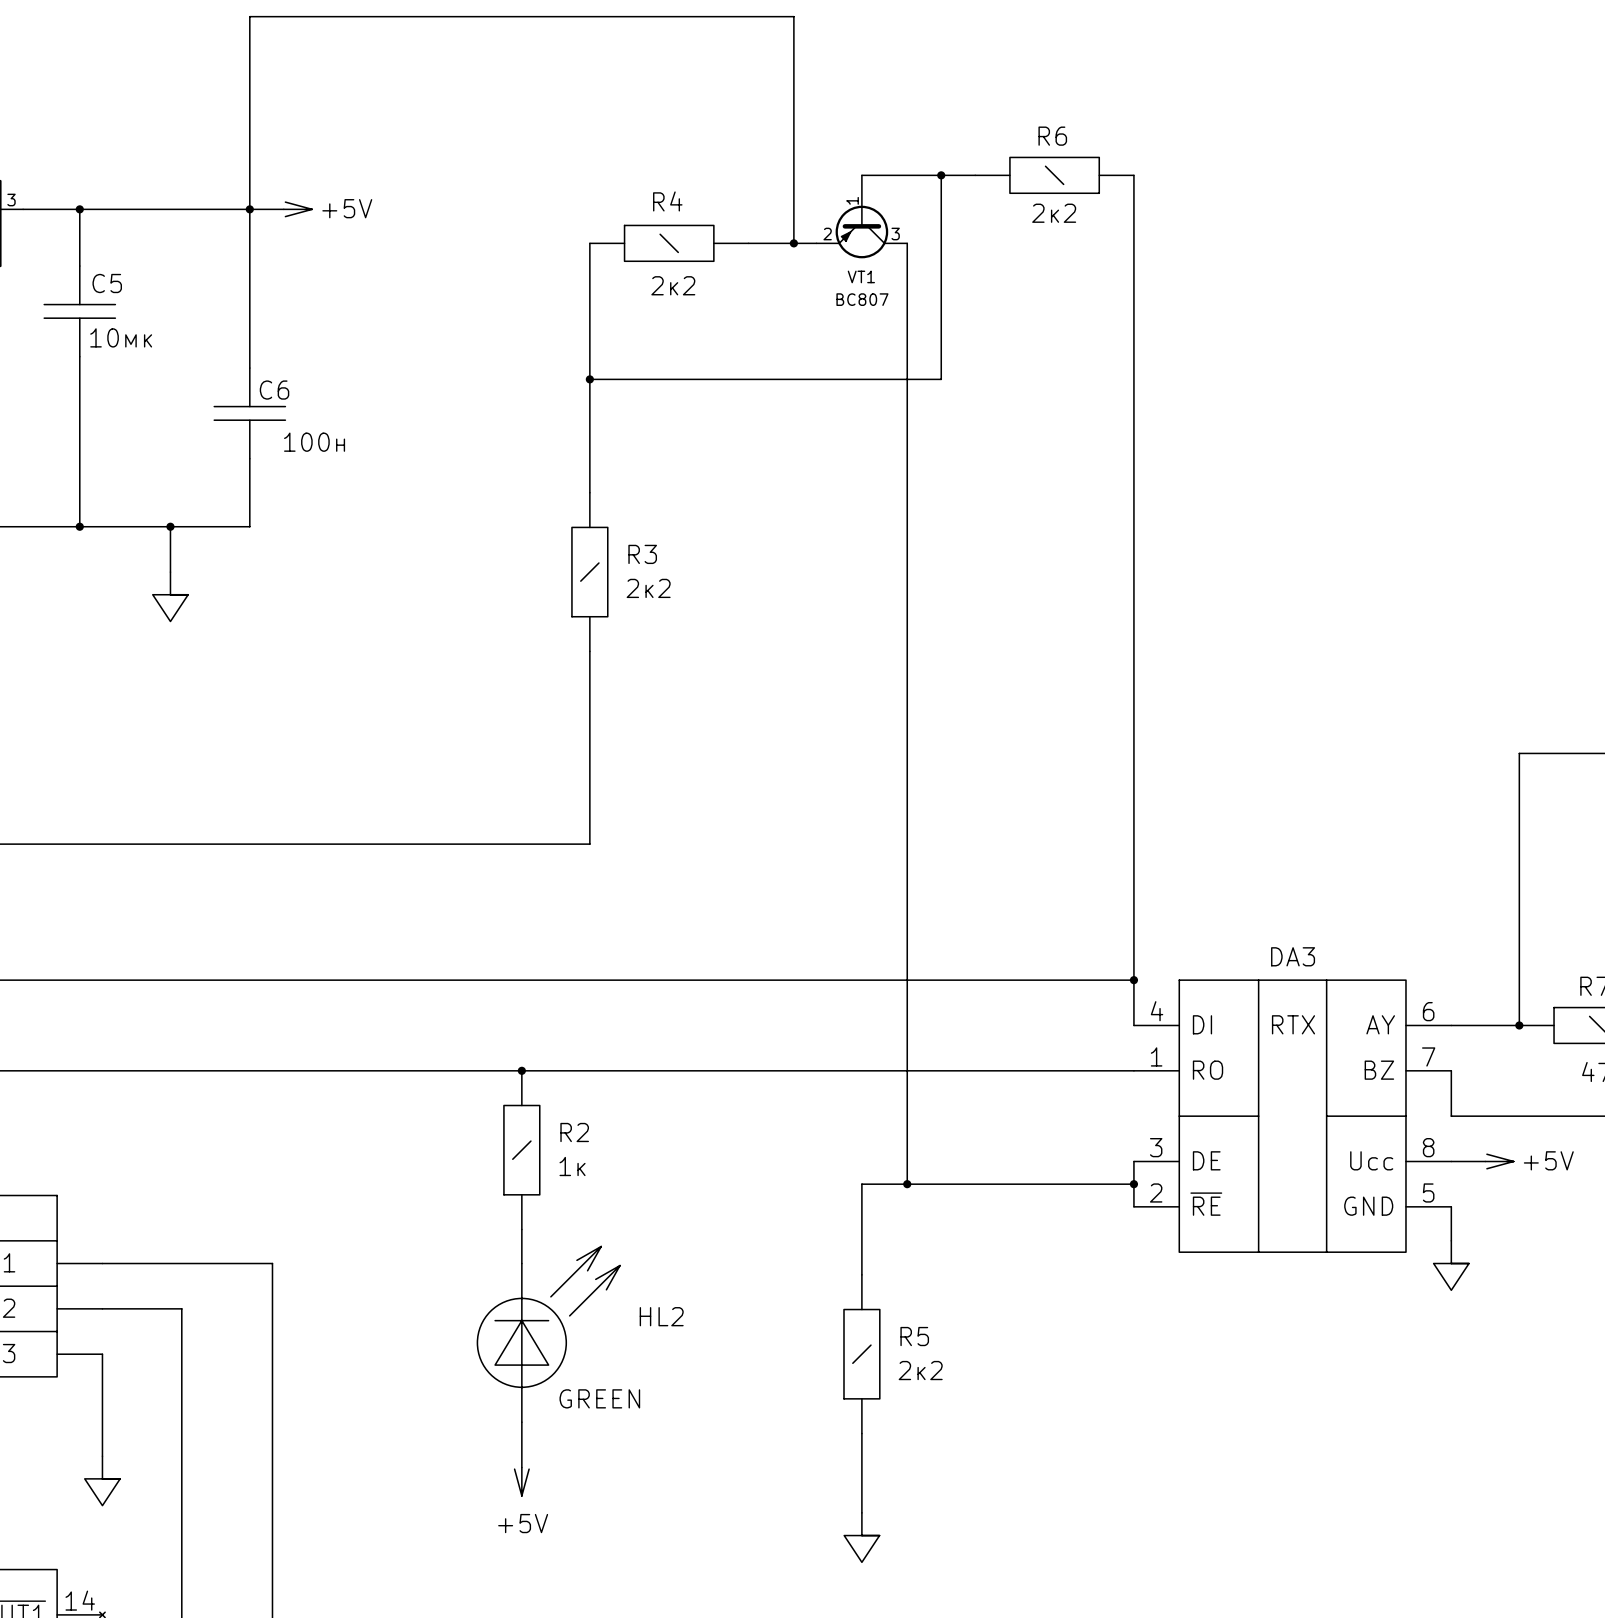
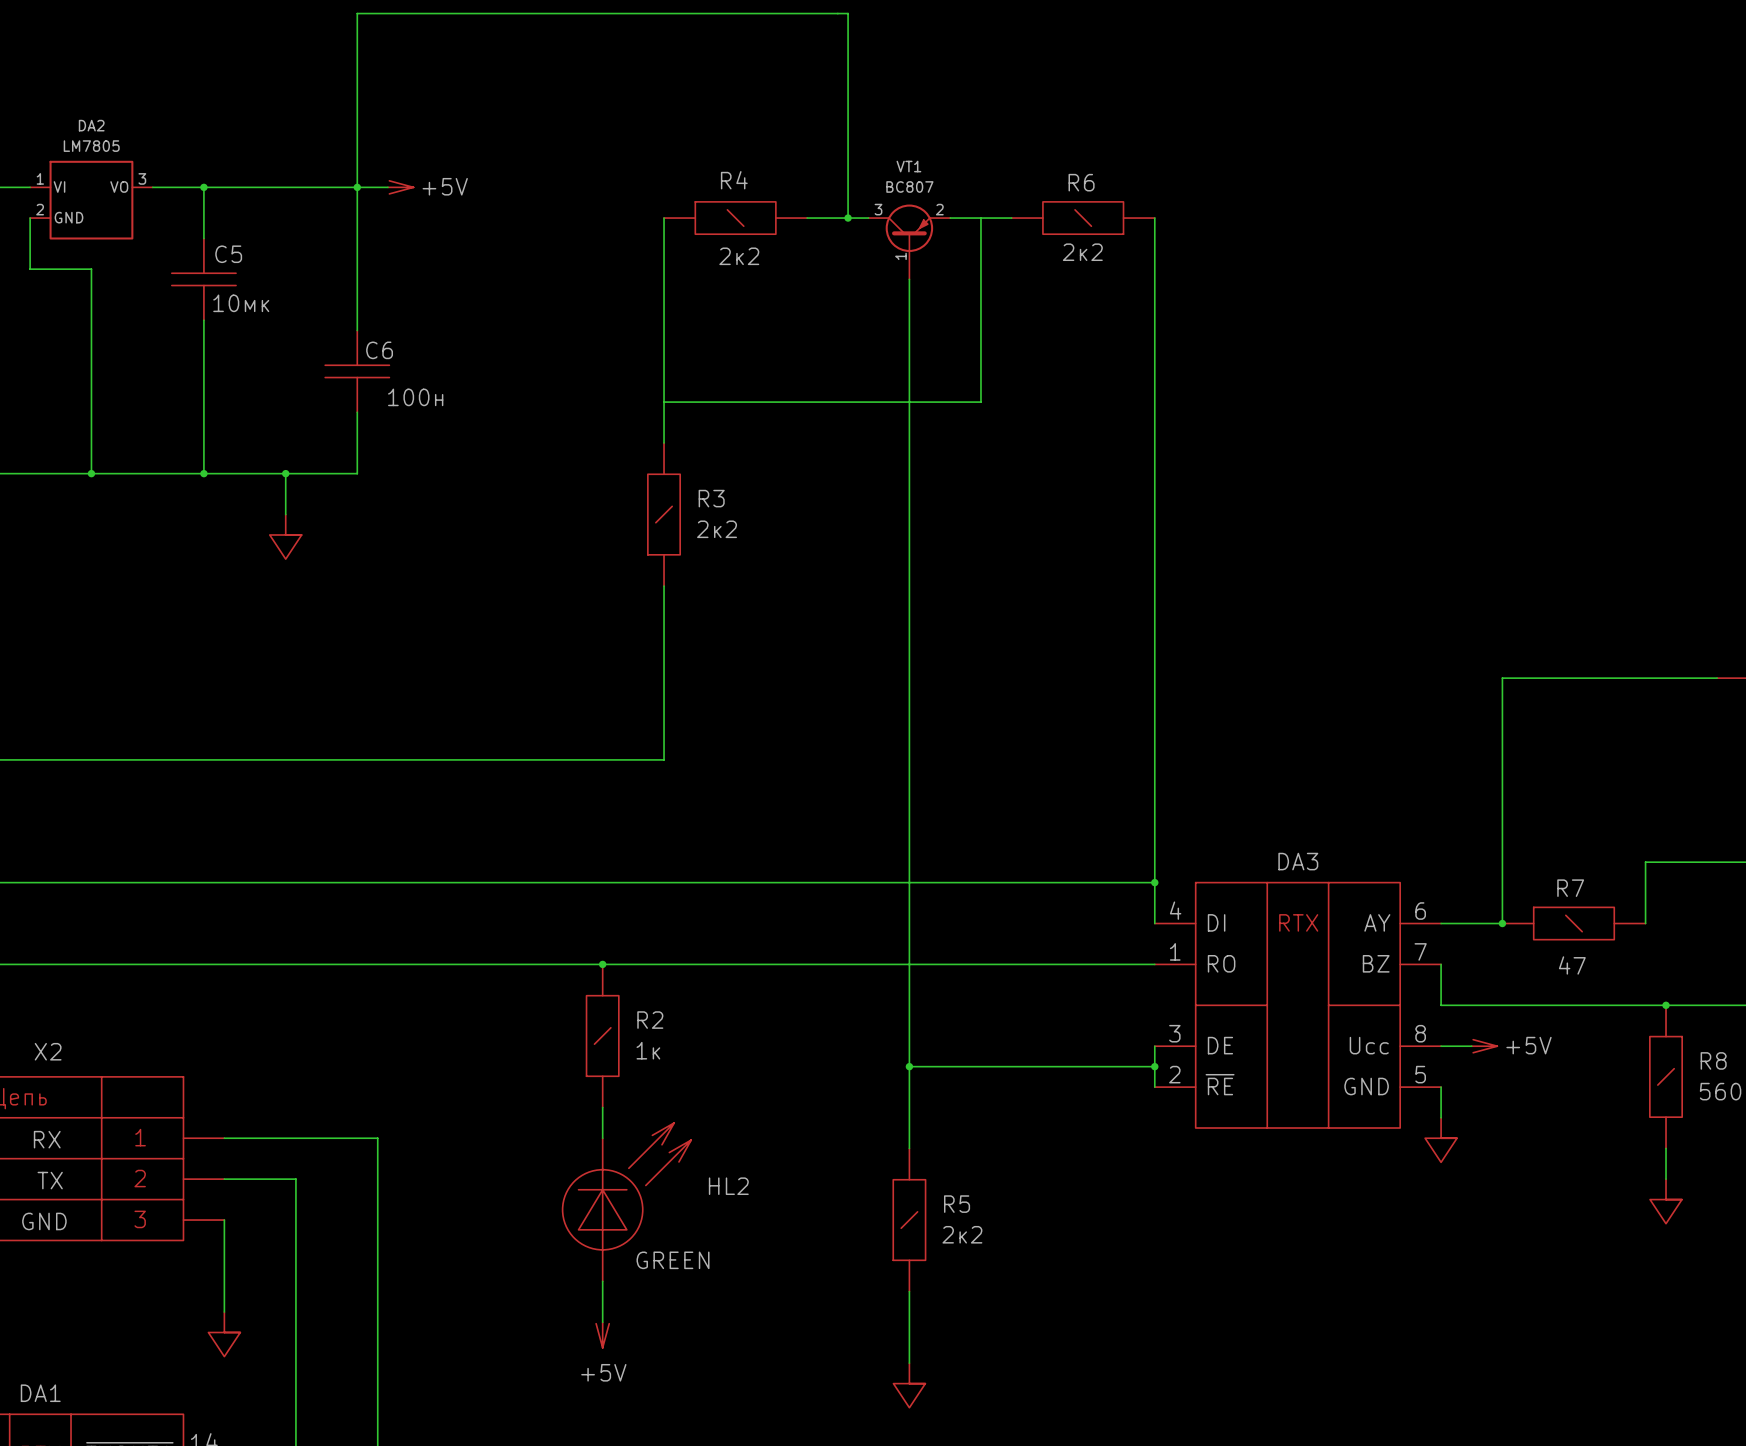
wire: (861, 175) (975, 175) -> none
wire: (941, 175) (941, 243) -> none
junction: (941, 175) -> none
R6 position: (1054, 175) -> (1083, 218)
wire: (1133, 175) (1133, 243) -> none
VT1 rotation: 0° (861, 232) -> 180° (909, 228)
wire: (907, 243) (907, 1184) -> (950, 218) (1011, 218)
VT1 name position: VT1 (861, 276) -> VT1 (908, 166)
VT1 value position: BC807 (862, 299) -> BC807 (909, 186)
wire: none -> (909, 279) (909, 1066)
wire: (589, 379) (941, 379) -> (664, 402) (980, 402) (980, 340)
junction: (589, 379) -> none
junction position: (907, 1184) -> (909, 1066)

